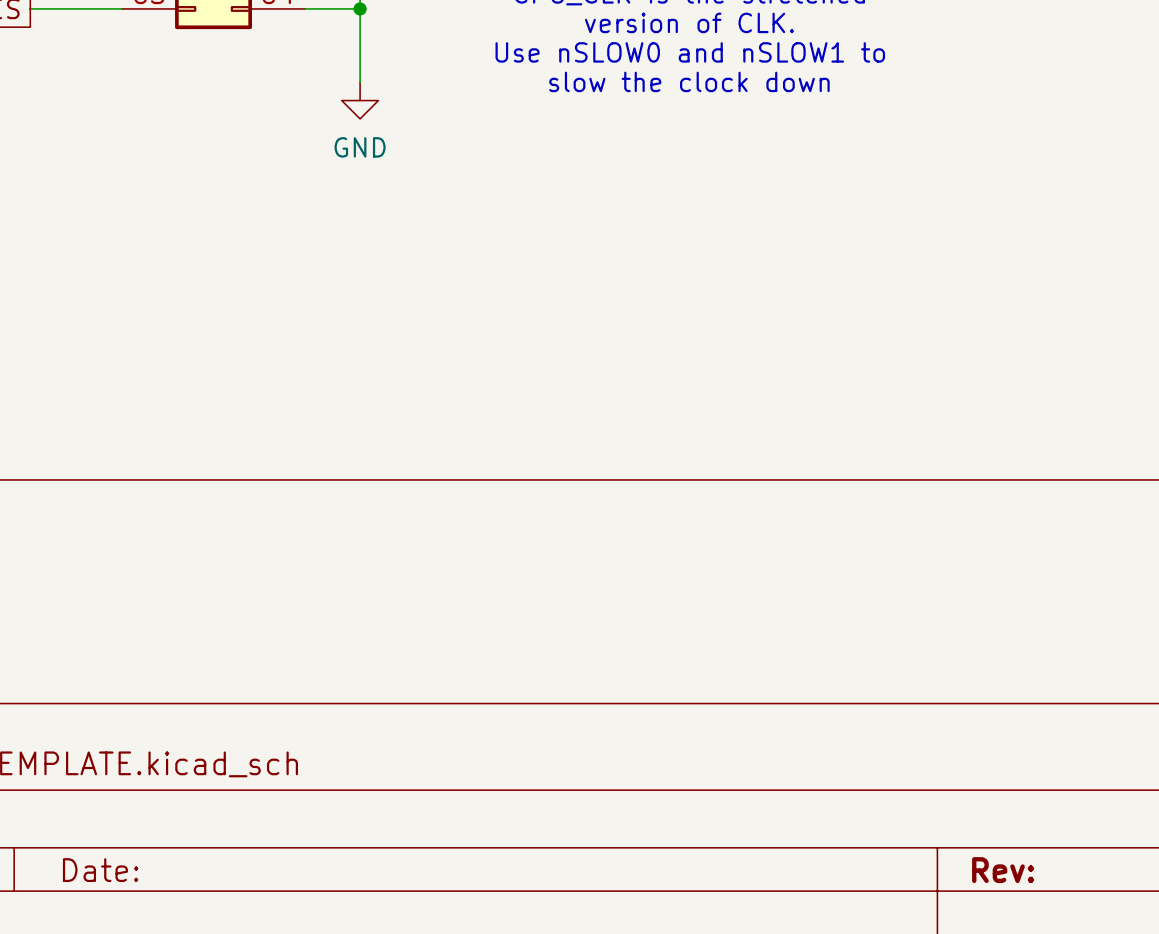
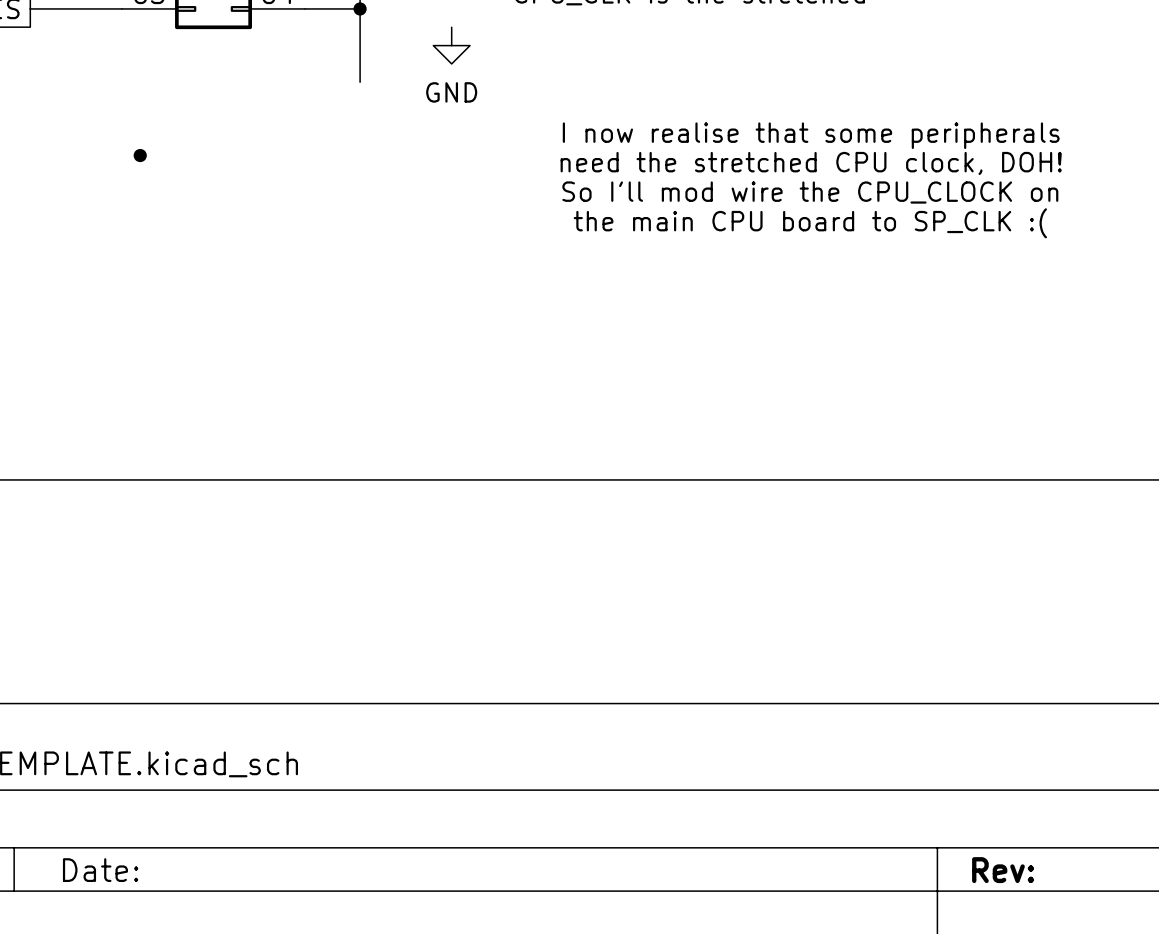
text: version of CLK. (689, 22) -> none
text: Use nSLOW0 and nSLOW1 to (690, 52) -> none
text: slow the clock down (689, 81) -> none
power symbol position: GND (360, 100) -> GND (451, 45)
text: none -> I now realise that some peripherals (811, 135)
junction: none -> (140, 155)
text: none -> need the stretched CPU clock, DOH! (811, 163)
text: none -> So I'll mod wire the CPU_CLOCK on (810, 192)
text: none -> the main CPU board to SP_CLK :( (810, 223)

